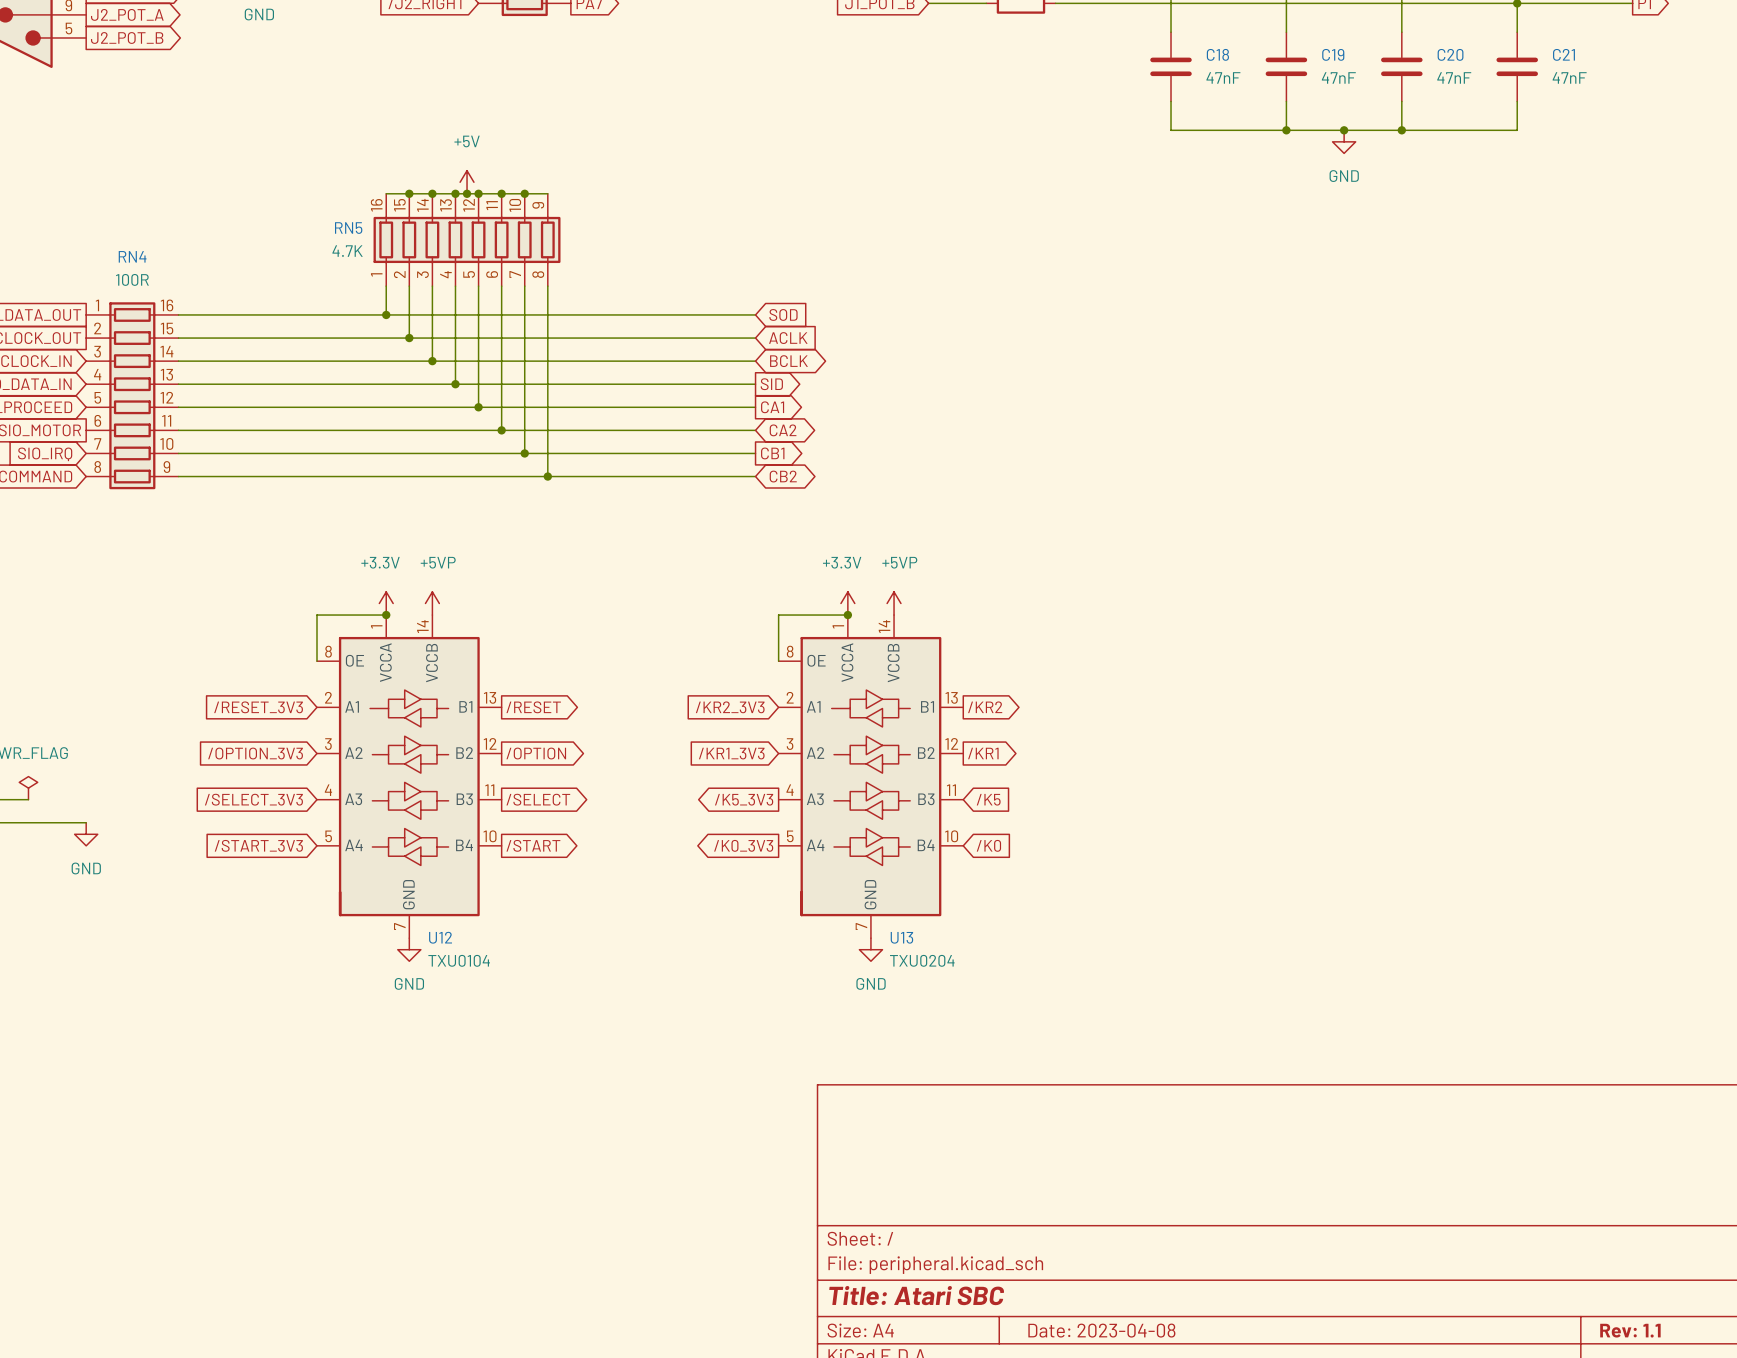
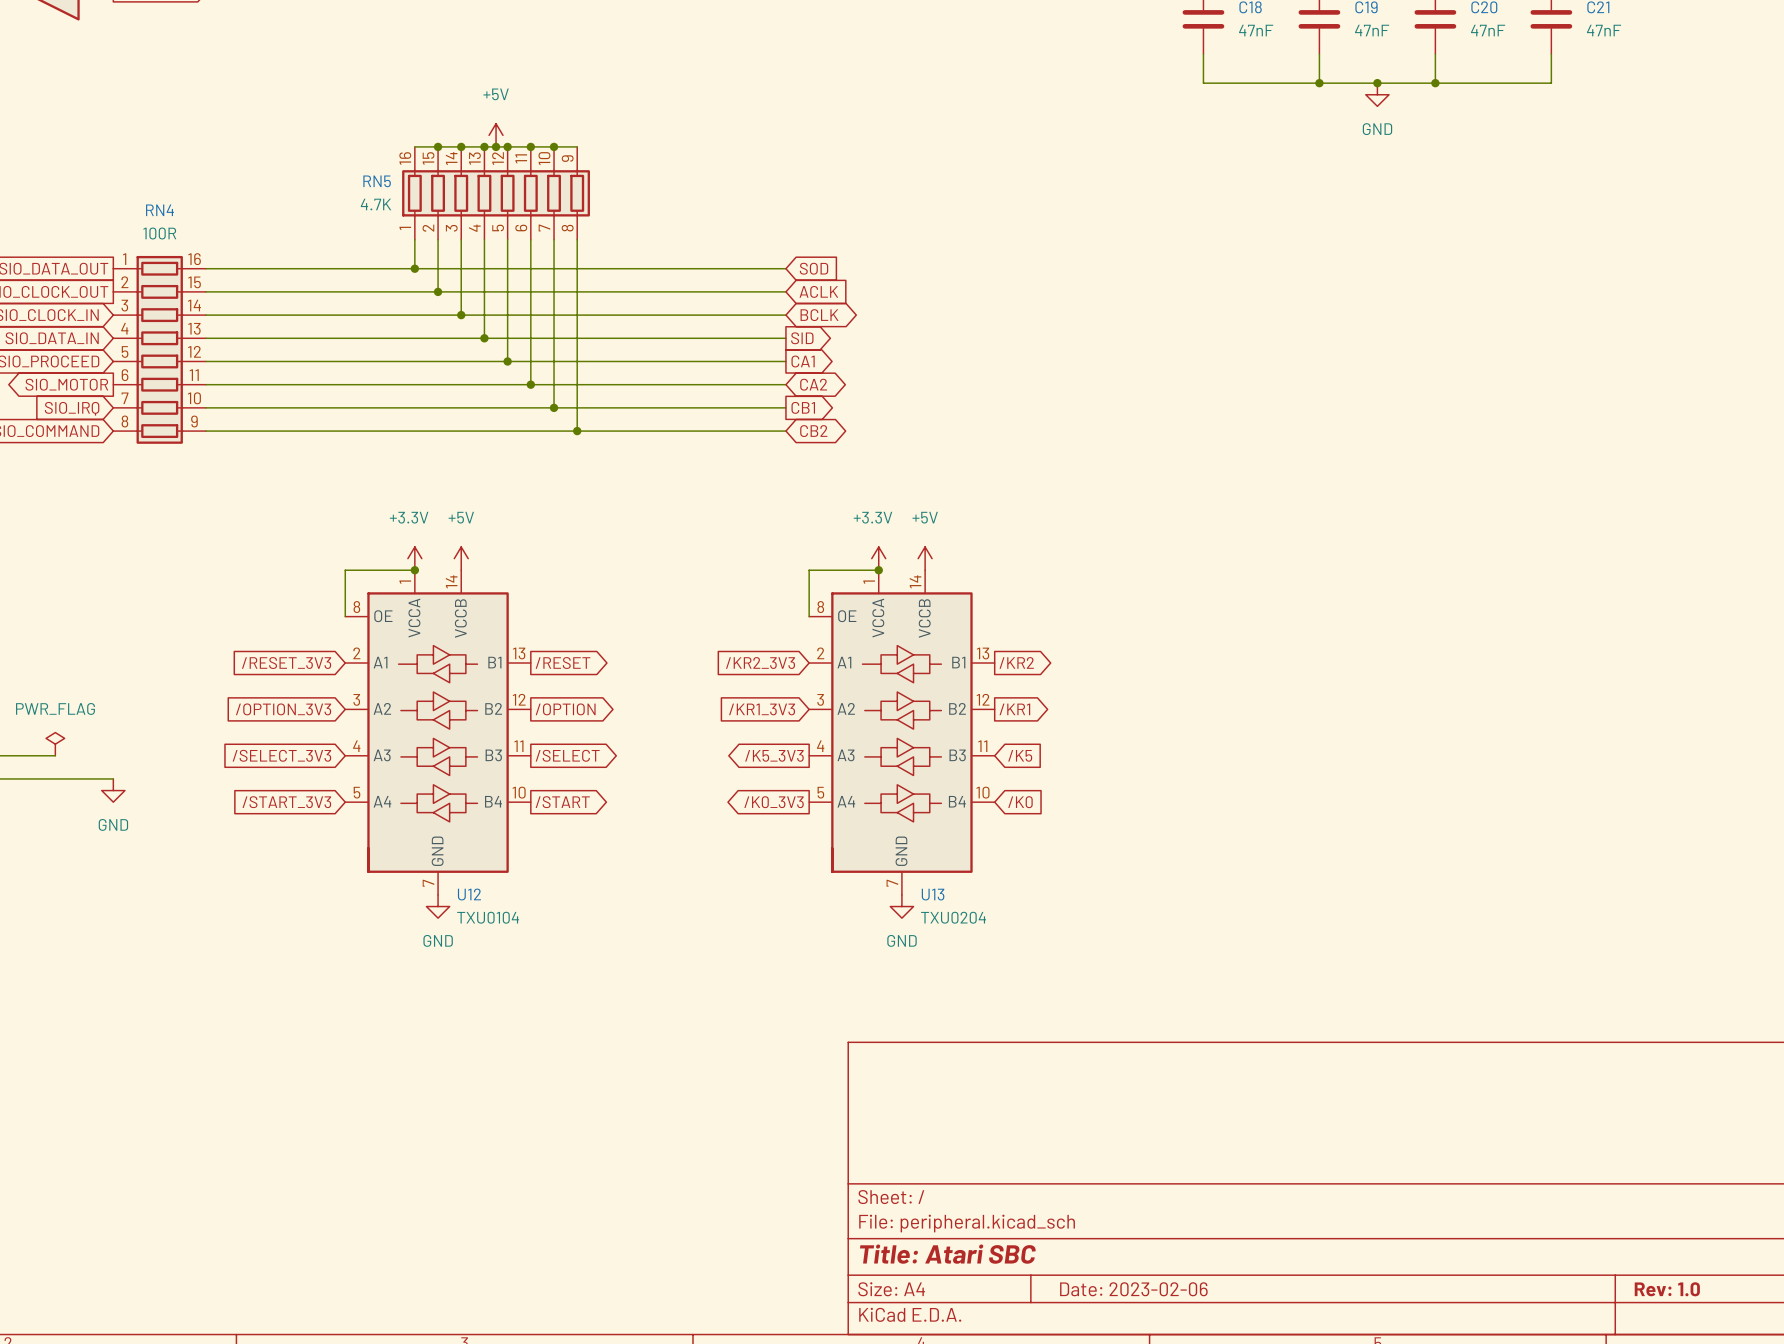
power symbol: +5VP (432, 603) -> +5V (461, 558)
power symbol: +5VP (894, 603) -> +5V (925, 558)
title block: Date: 2023-04-08 (1101, 1330) -> Date: 2023-02-06 (1133, 1289)
title block: Rev: 1.1 (1630, 1330) -> Rev: 1.0 (1667, 1289)

